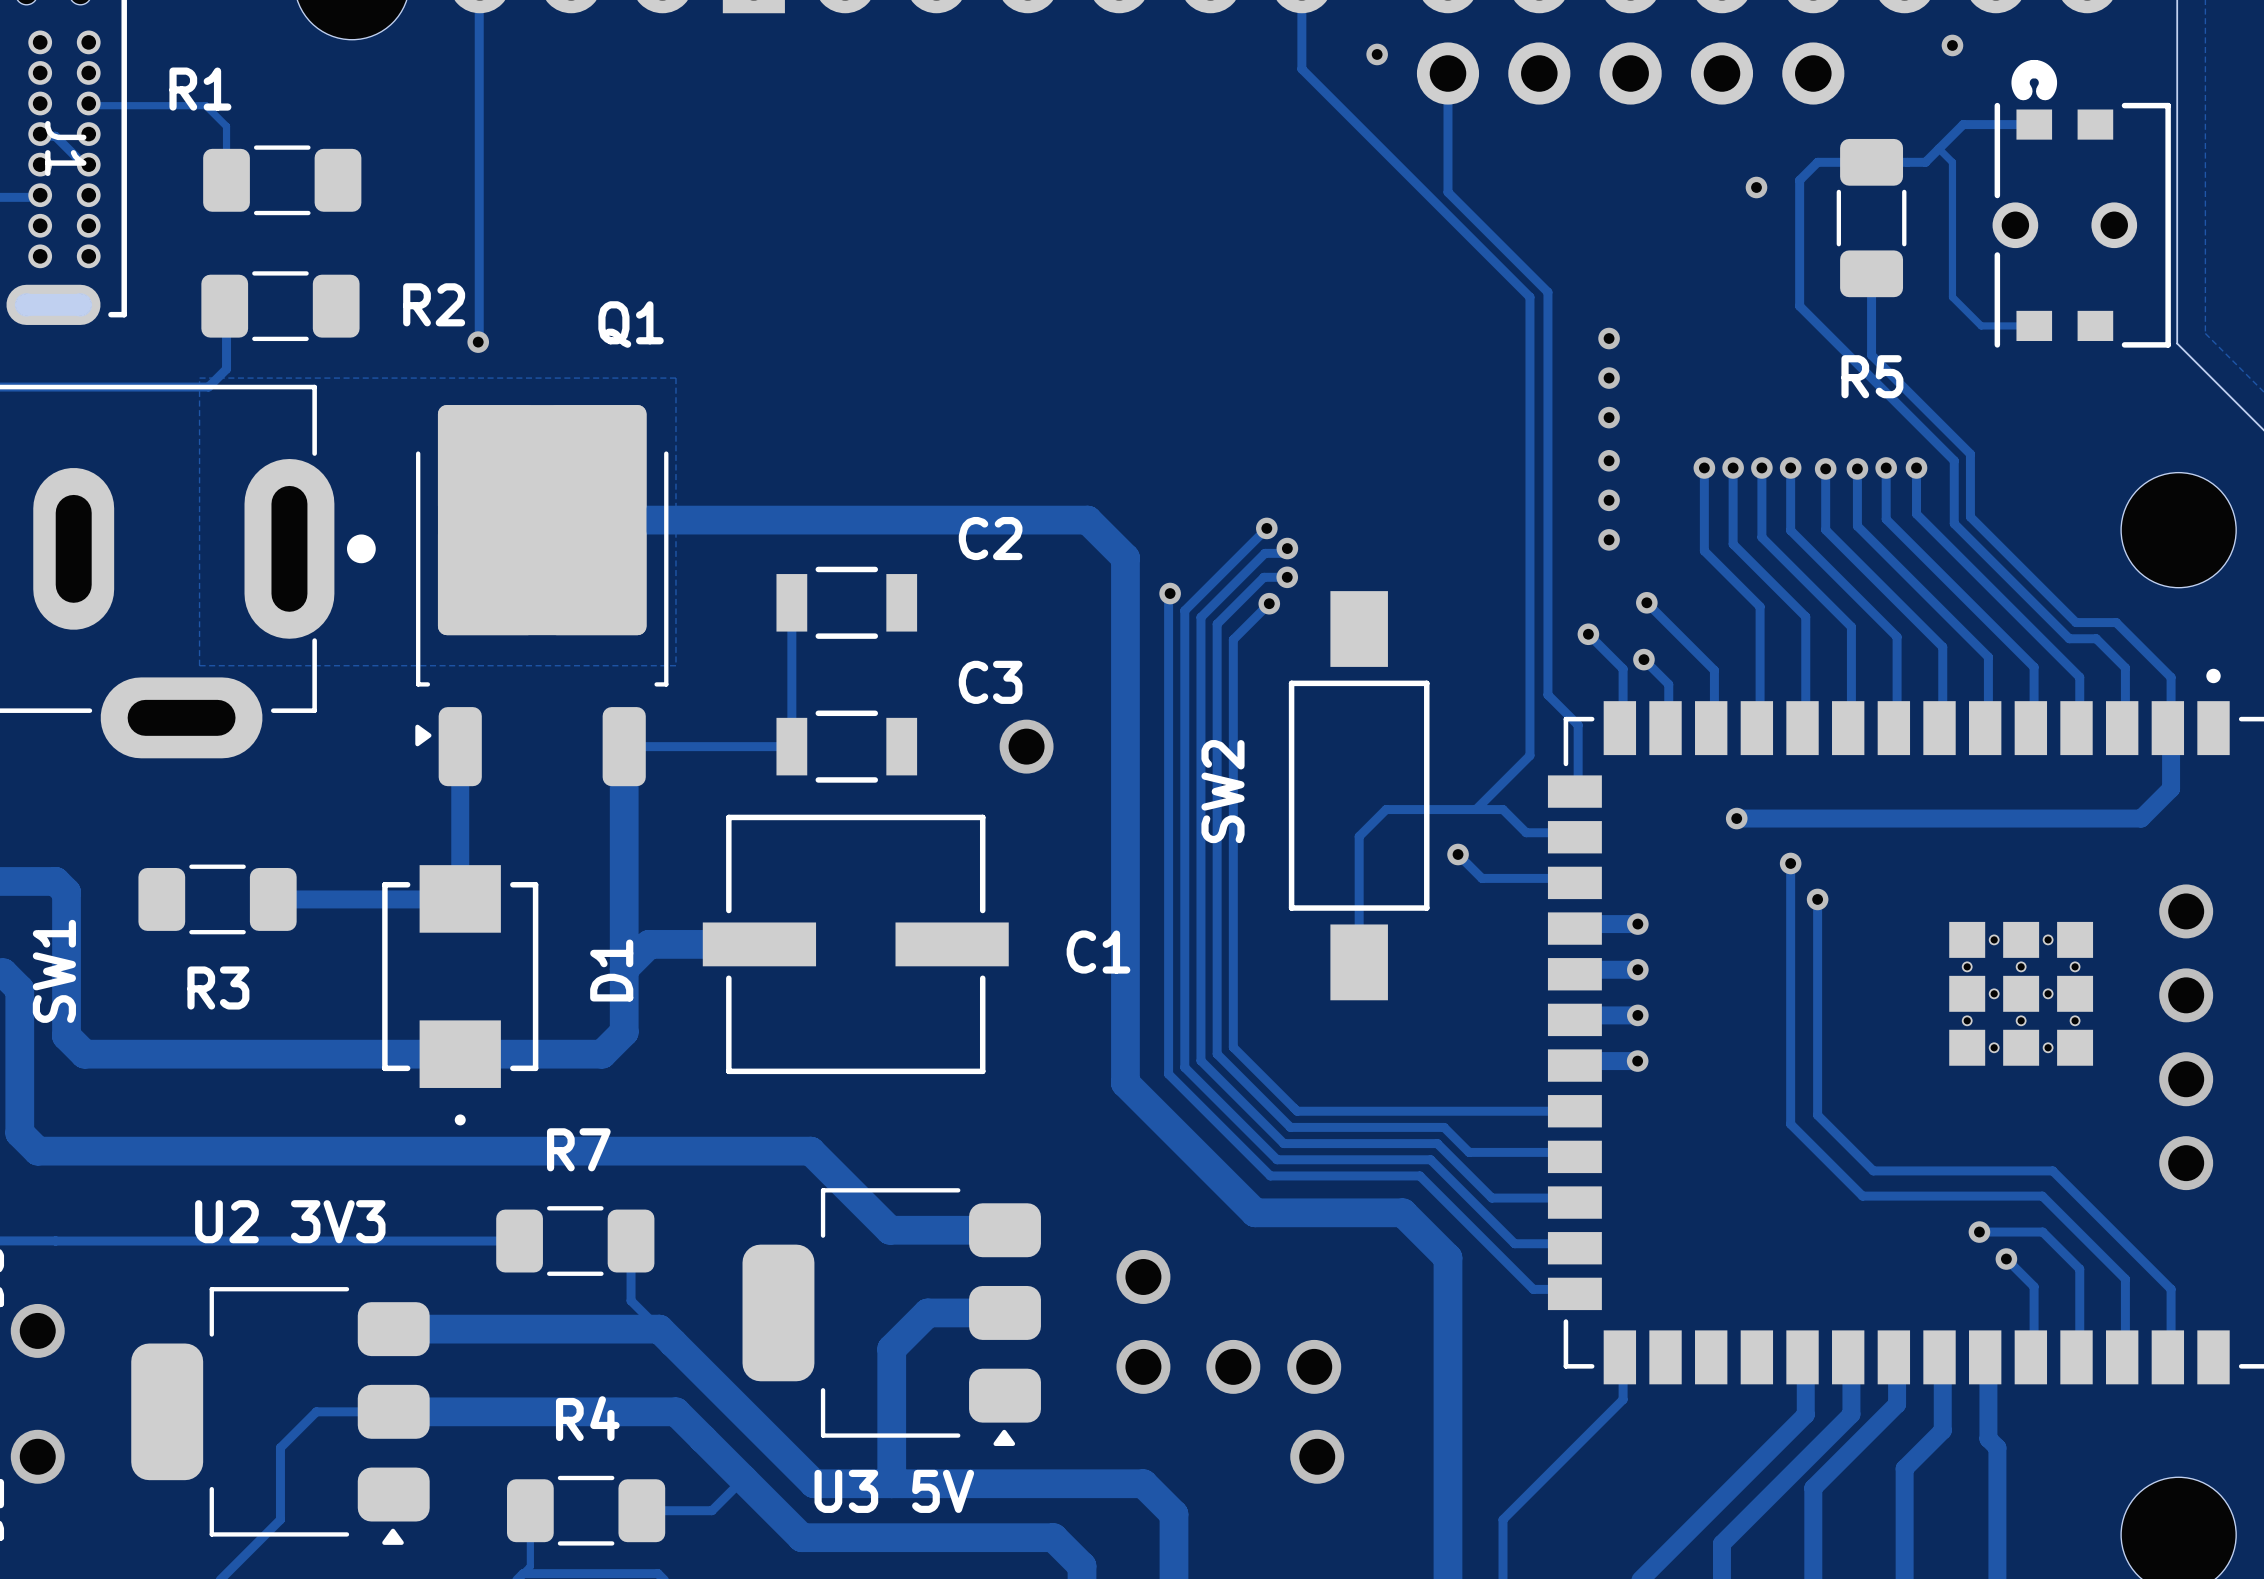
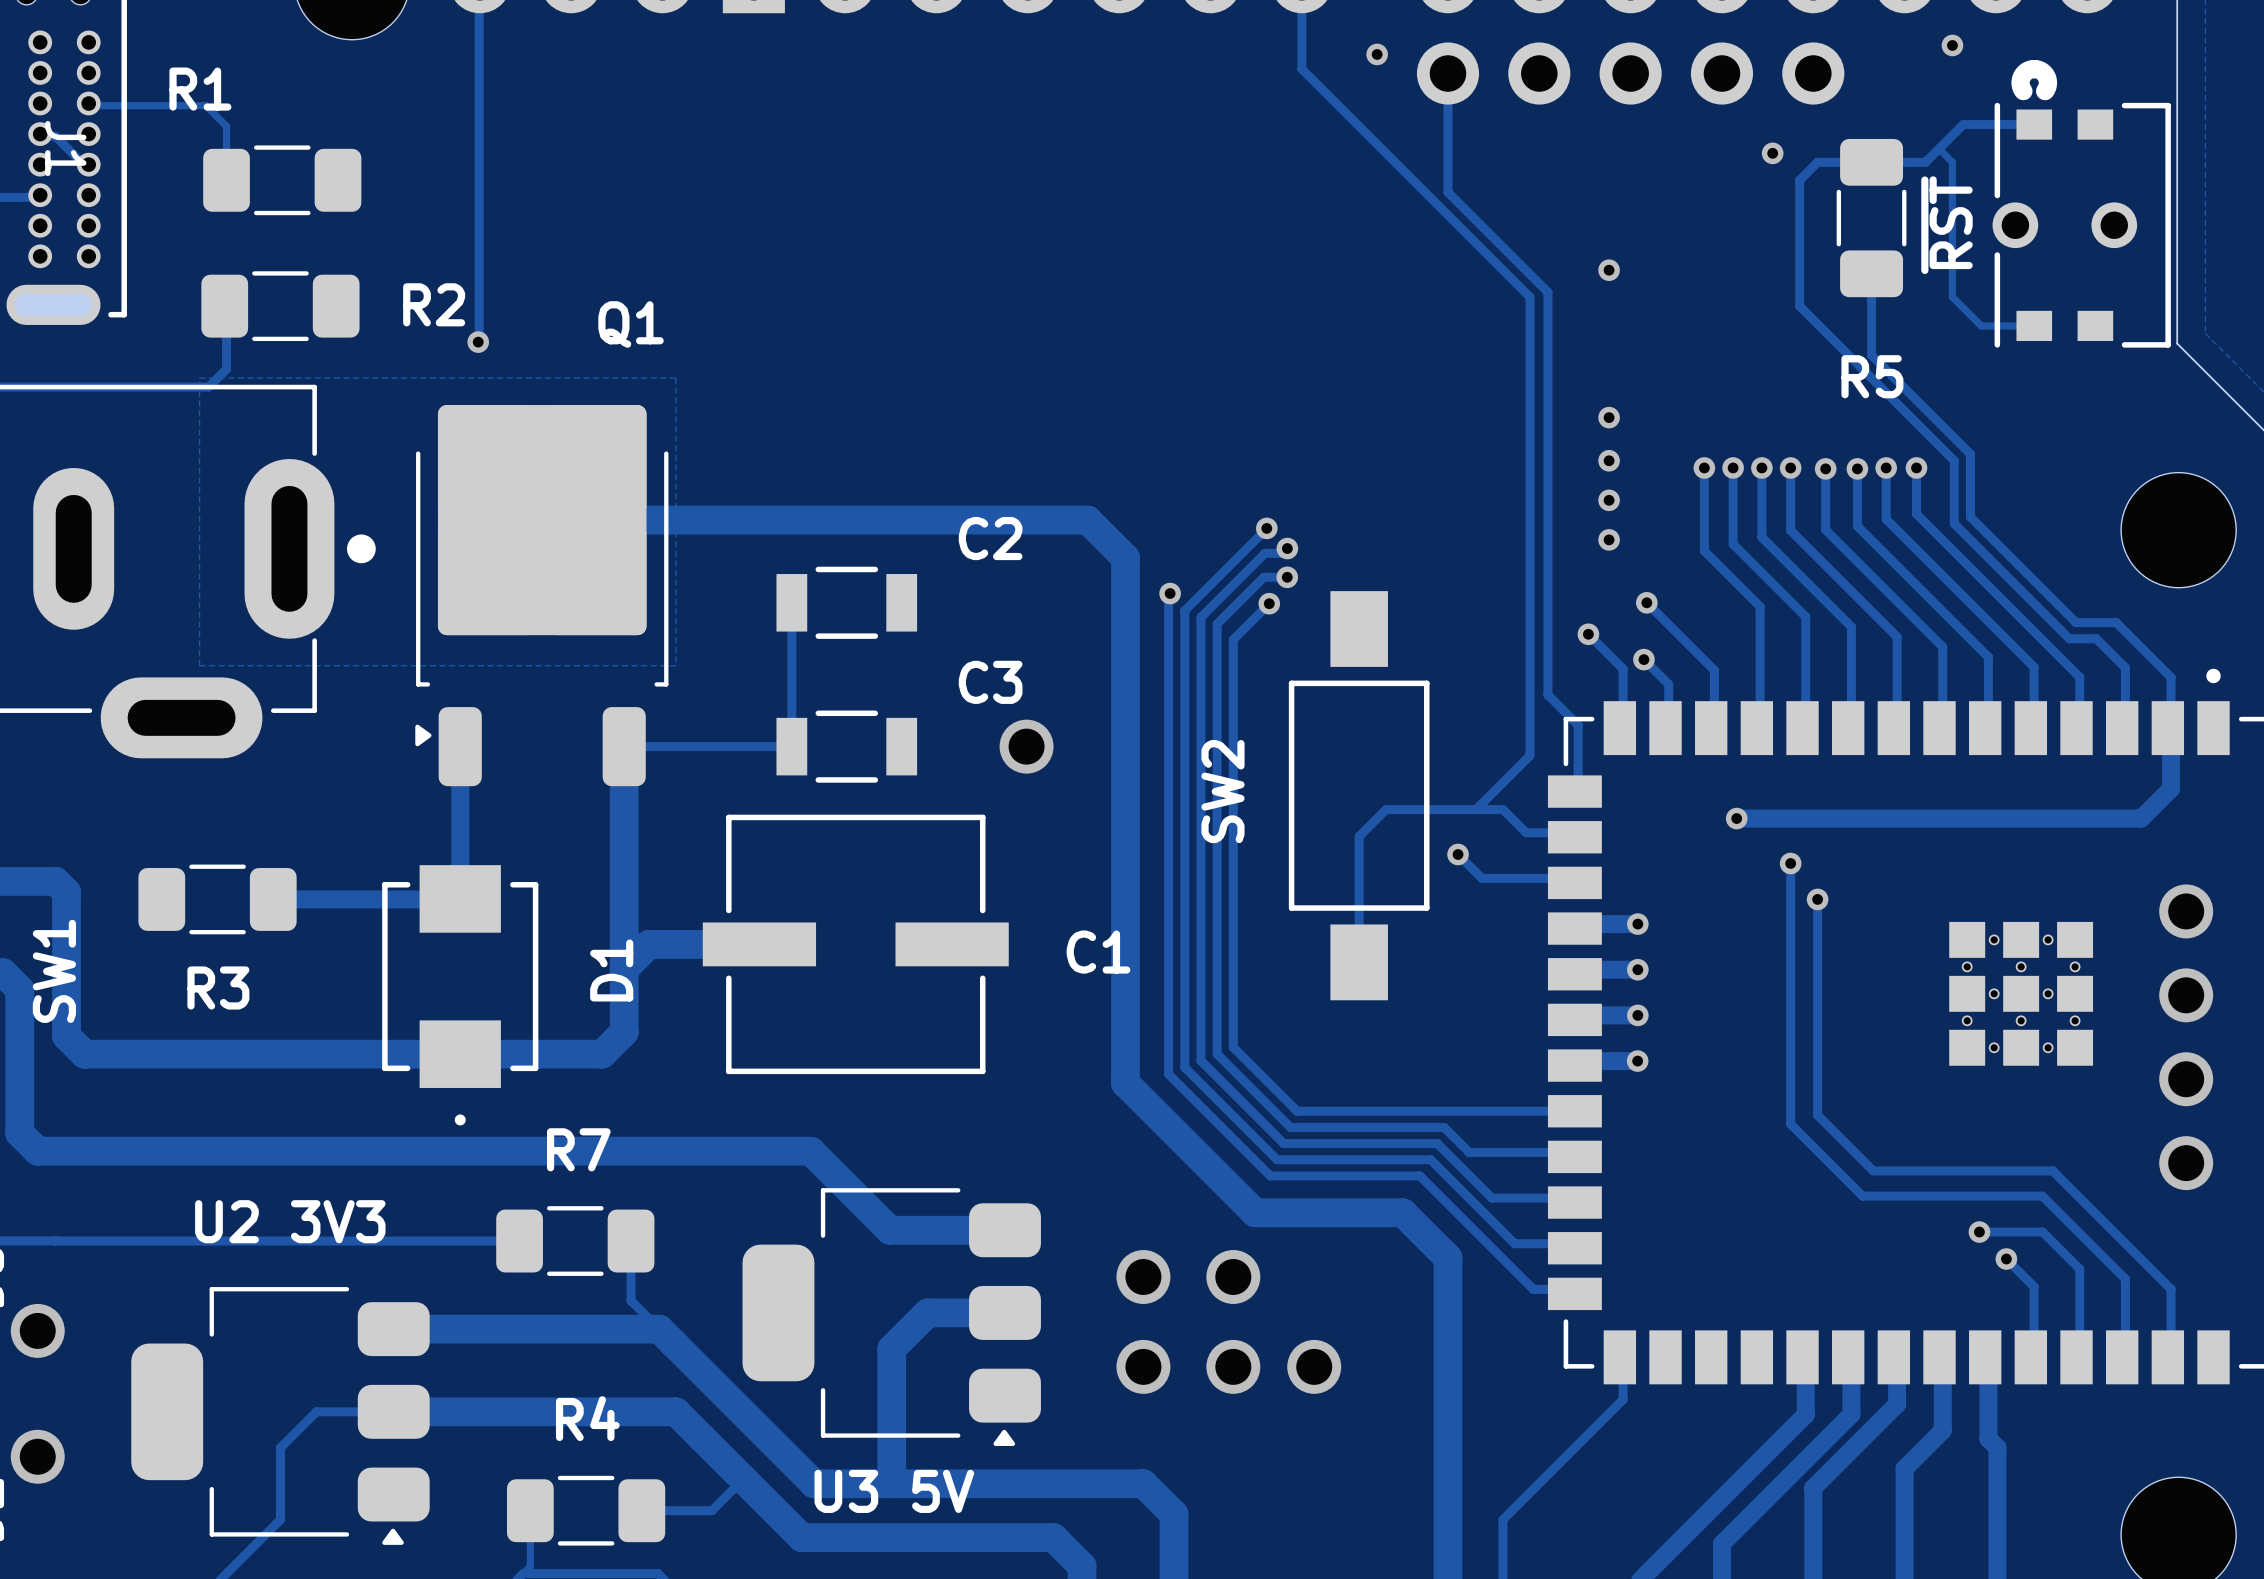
via position: (1756, 187) -> (1772, 153)
~{RST} name: none -> ~{RST} (1946, 225)
via: none -> (1609, 270)
via: (1609, 338) -> none
via: (1609, 378) -> none
via position: (1317, 1456) -> (1233, 1276)

